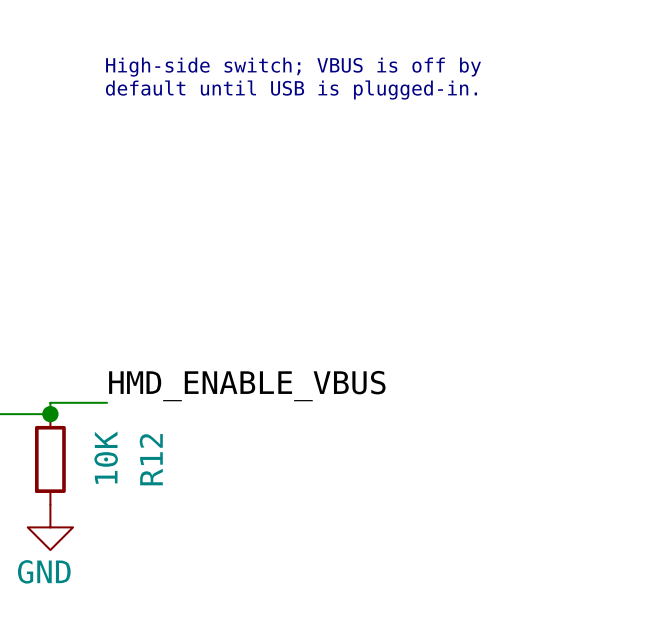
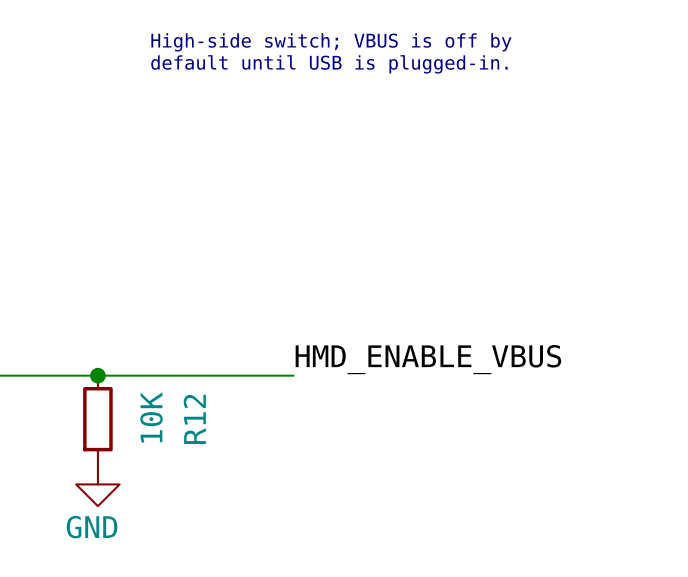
label position: HMD_ENABLE_VBUS (247, 386) -> HMD_ENABLE_VBUS (428, 359)
wire: (107, 402) (50, 402) (50, 414) -> (293, 375) (97, 375)

